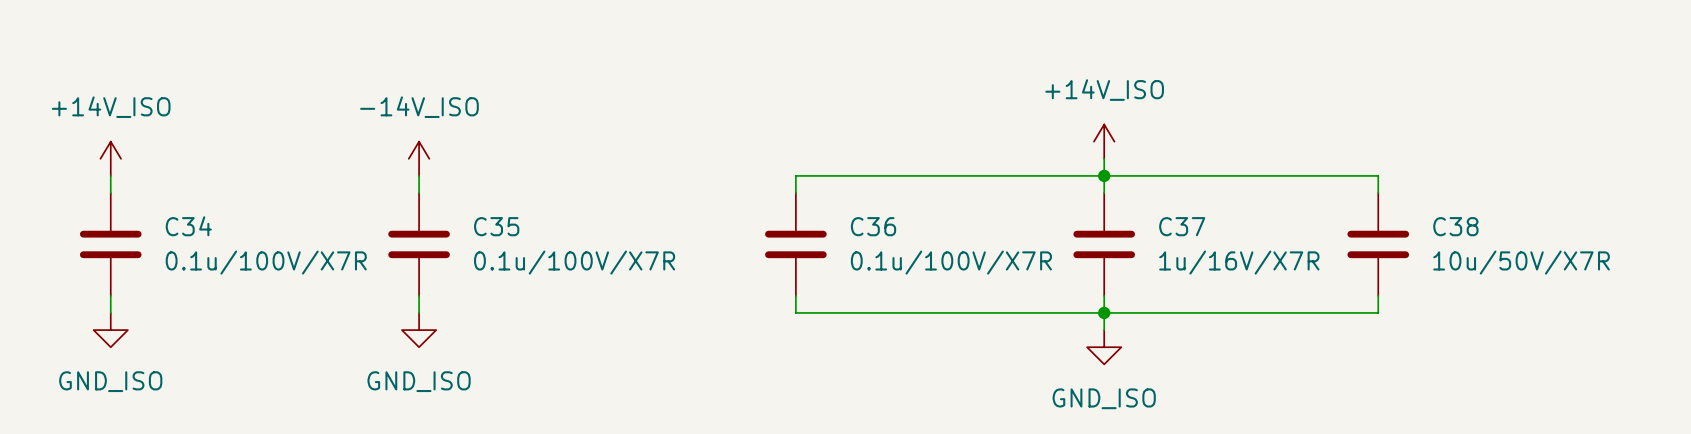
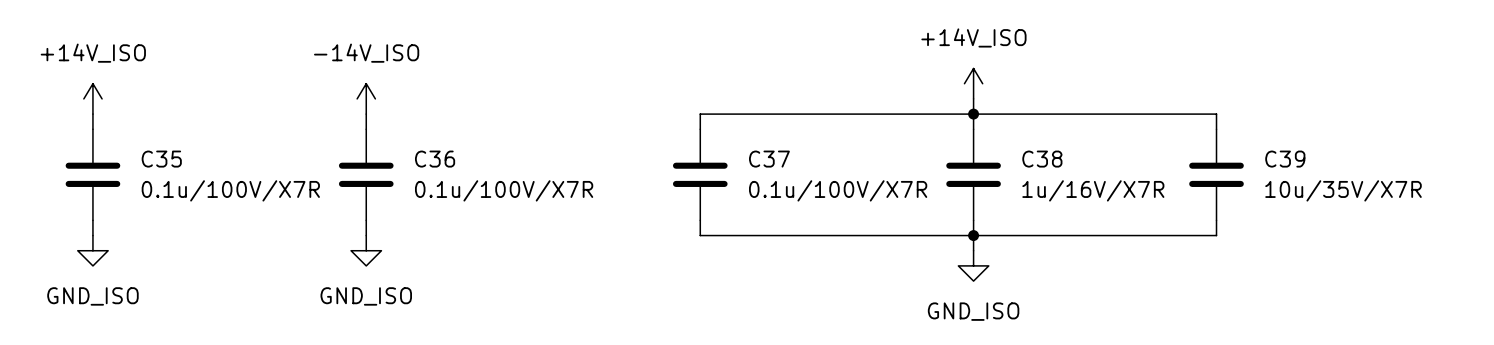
C34 name: C34 (188, 226) -> C35 (161, 159)
C35 name: C35 (496, 226) -> C36 (435, 159)
C36 name: C36 (873, 226) -> C37 (769, 159)
C37 name: C37 (1182, 226) -> C38 (1042, 159)
C38 name: C38 (1455, 226) -> C39 (1285, 159)
C38 value: 10u/50V/X7R (1521, 262) -> 10u/35V/X7R (1343, 190)

